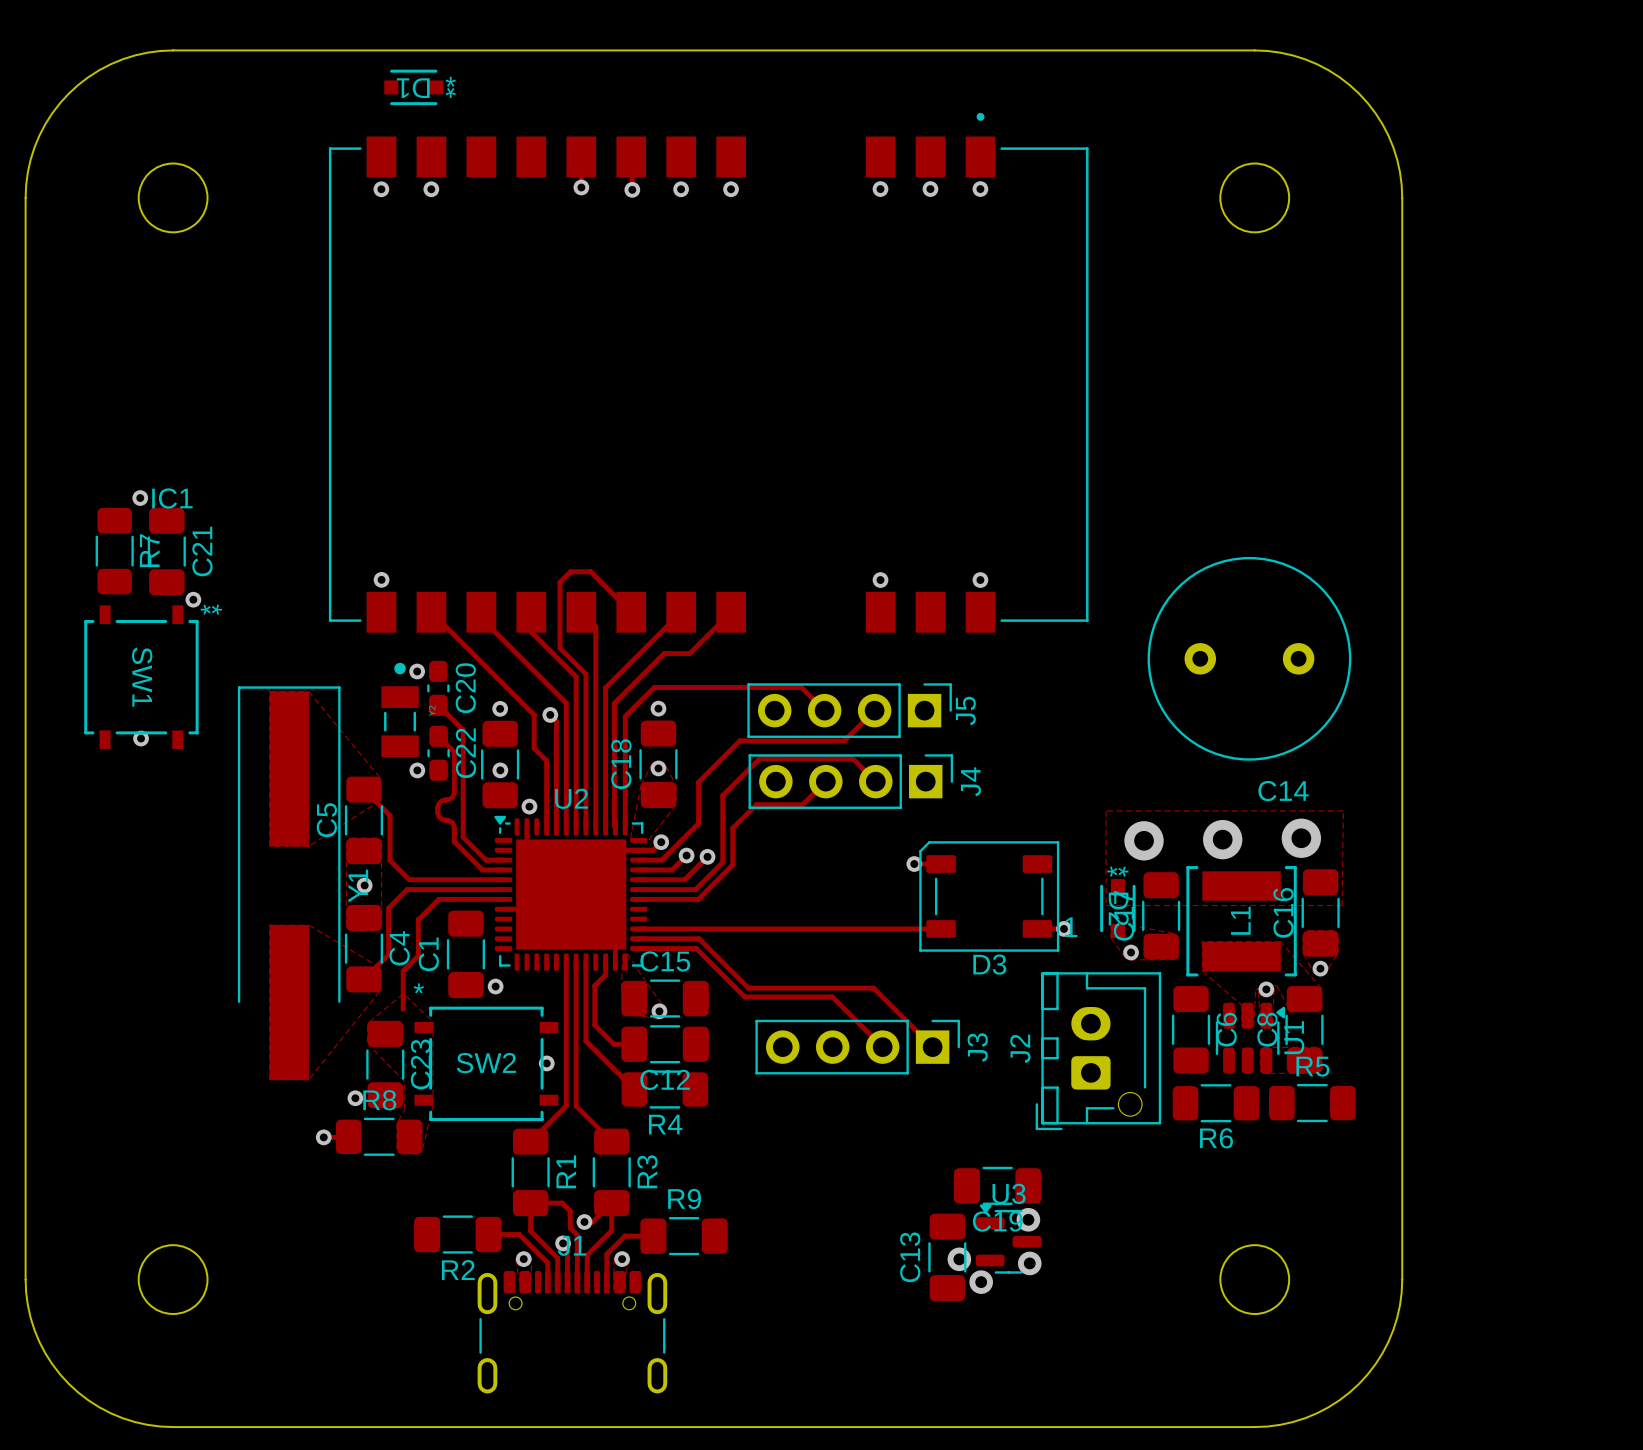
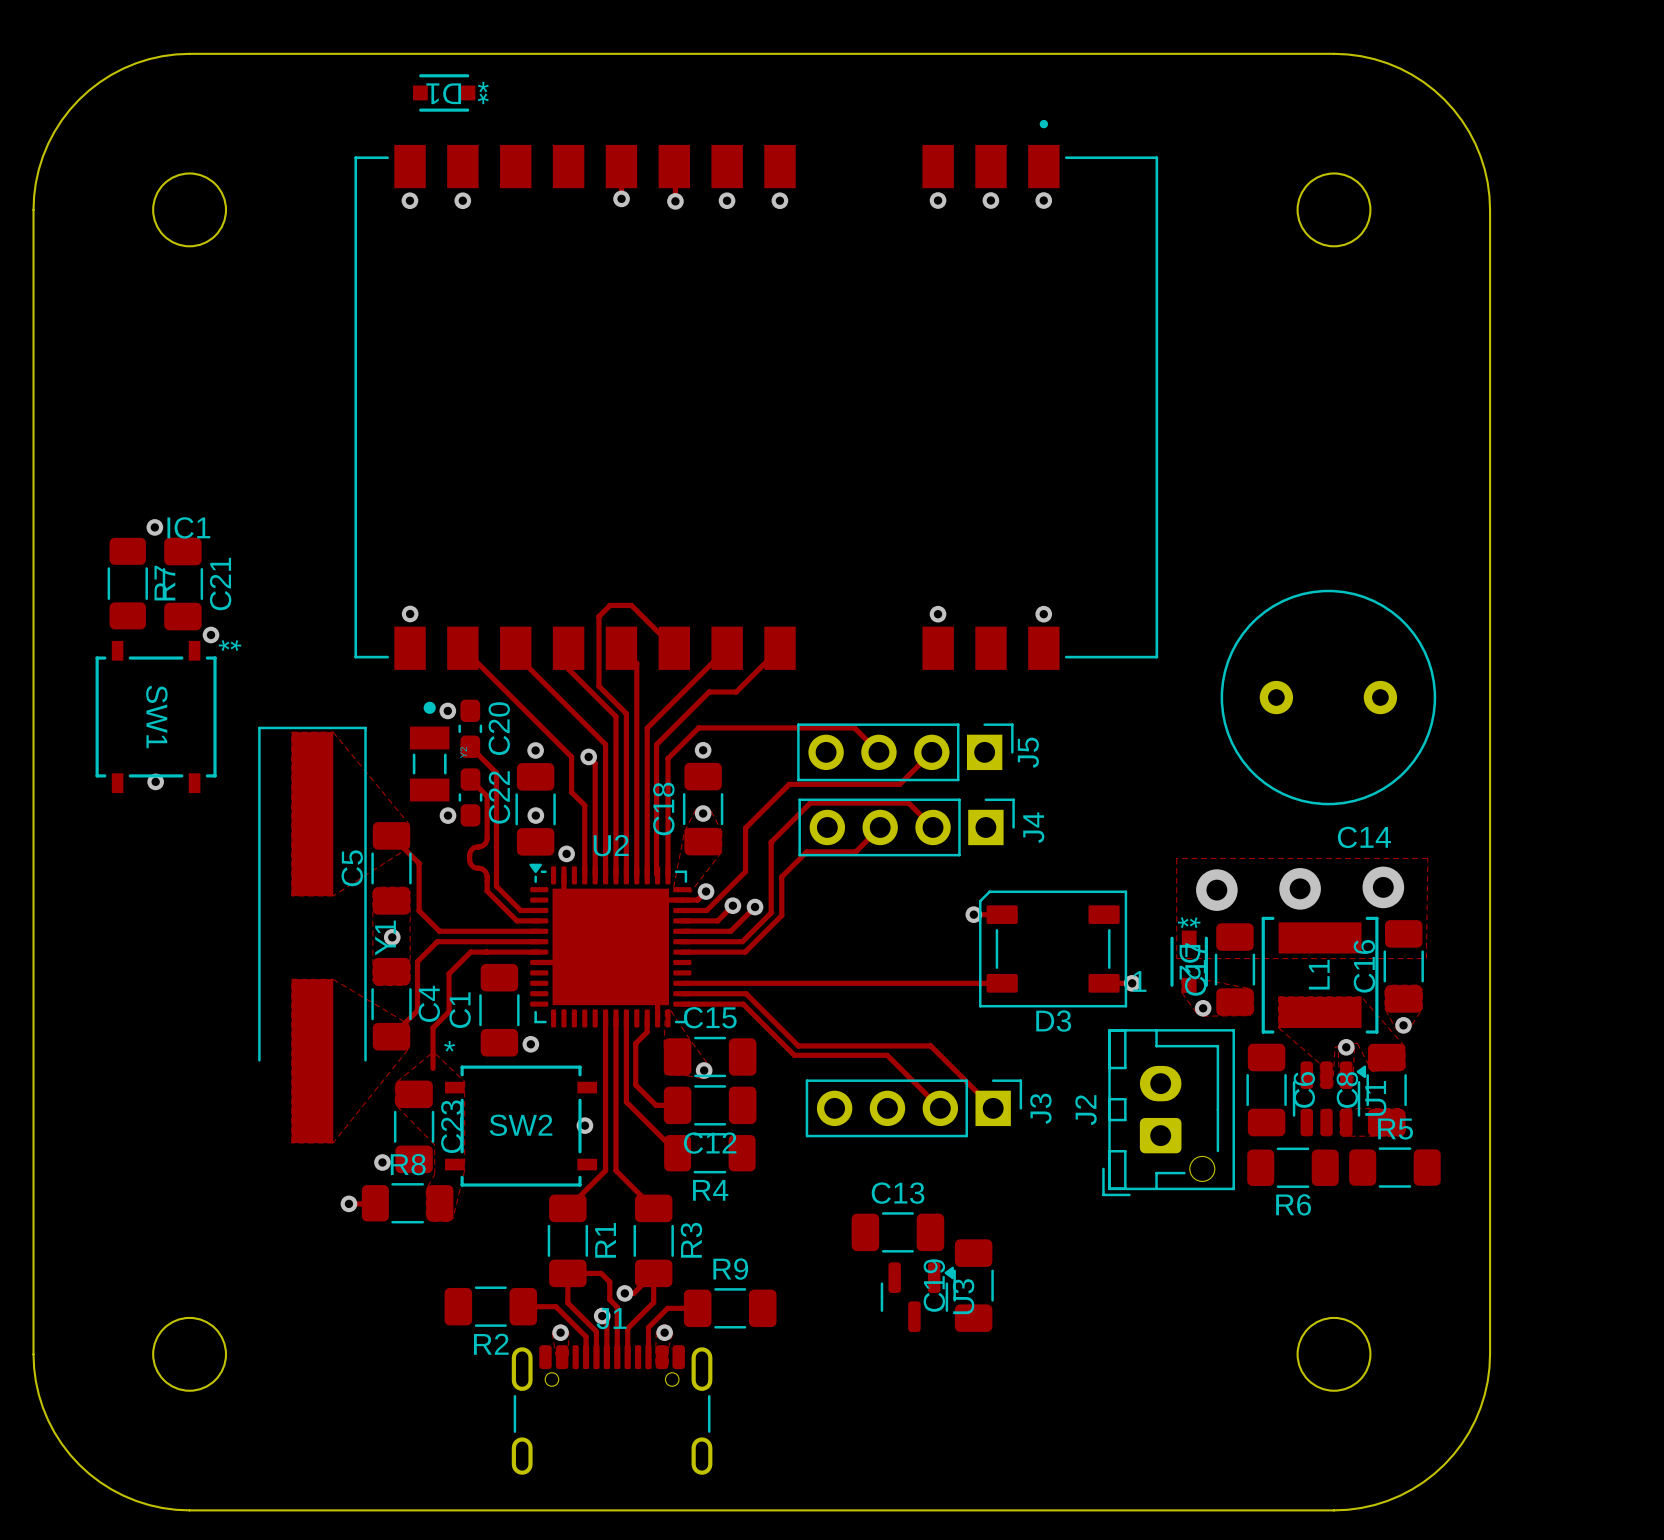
C19 rotation: 0° (997, 1185) -> 90° clockwise (973, 1285)
C19 position: (997, 1185) -> (973, 1285)
via: (1028, 1219) -> none
U3 rotation: 0° (1008, 1239) -> 90° clockwise (917, 1297)
U3 position: (1008, 1239) -> (917, 1297)
C13 rotation: 0° (947, 1257) -> 90° clockwise (897, 1232)
C13 position: (947, 1257) -> (897, 1232)
via: (959, 1259) -> none
via: (1029, 1263) -> none
via: (981, 1282) -> none

